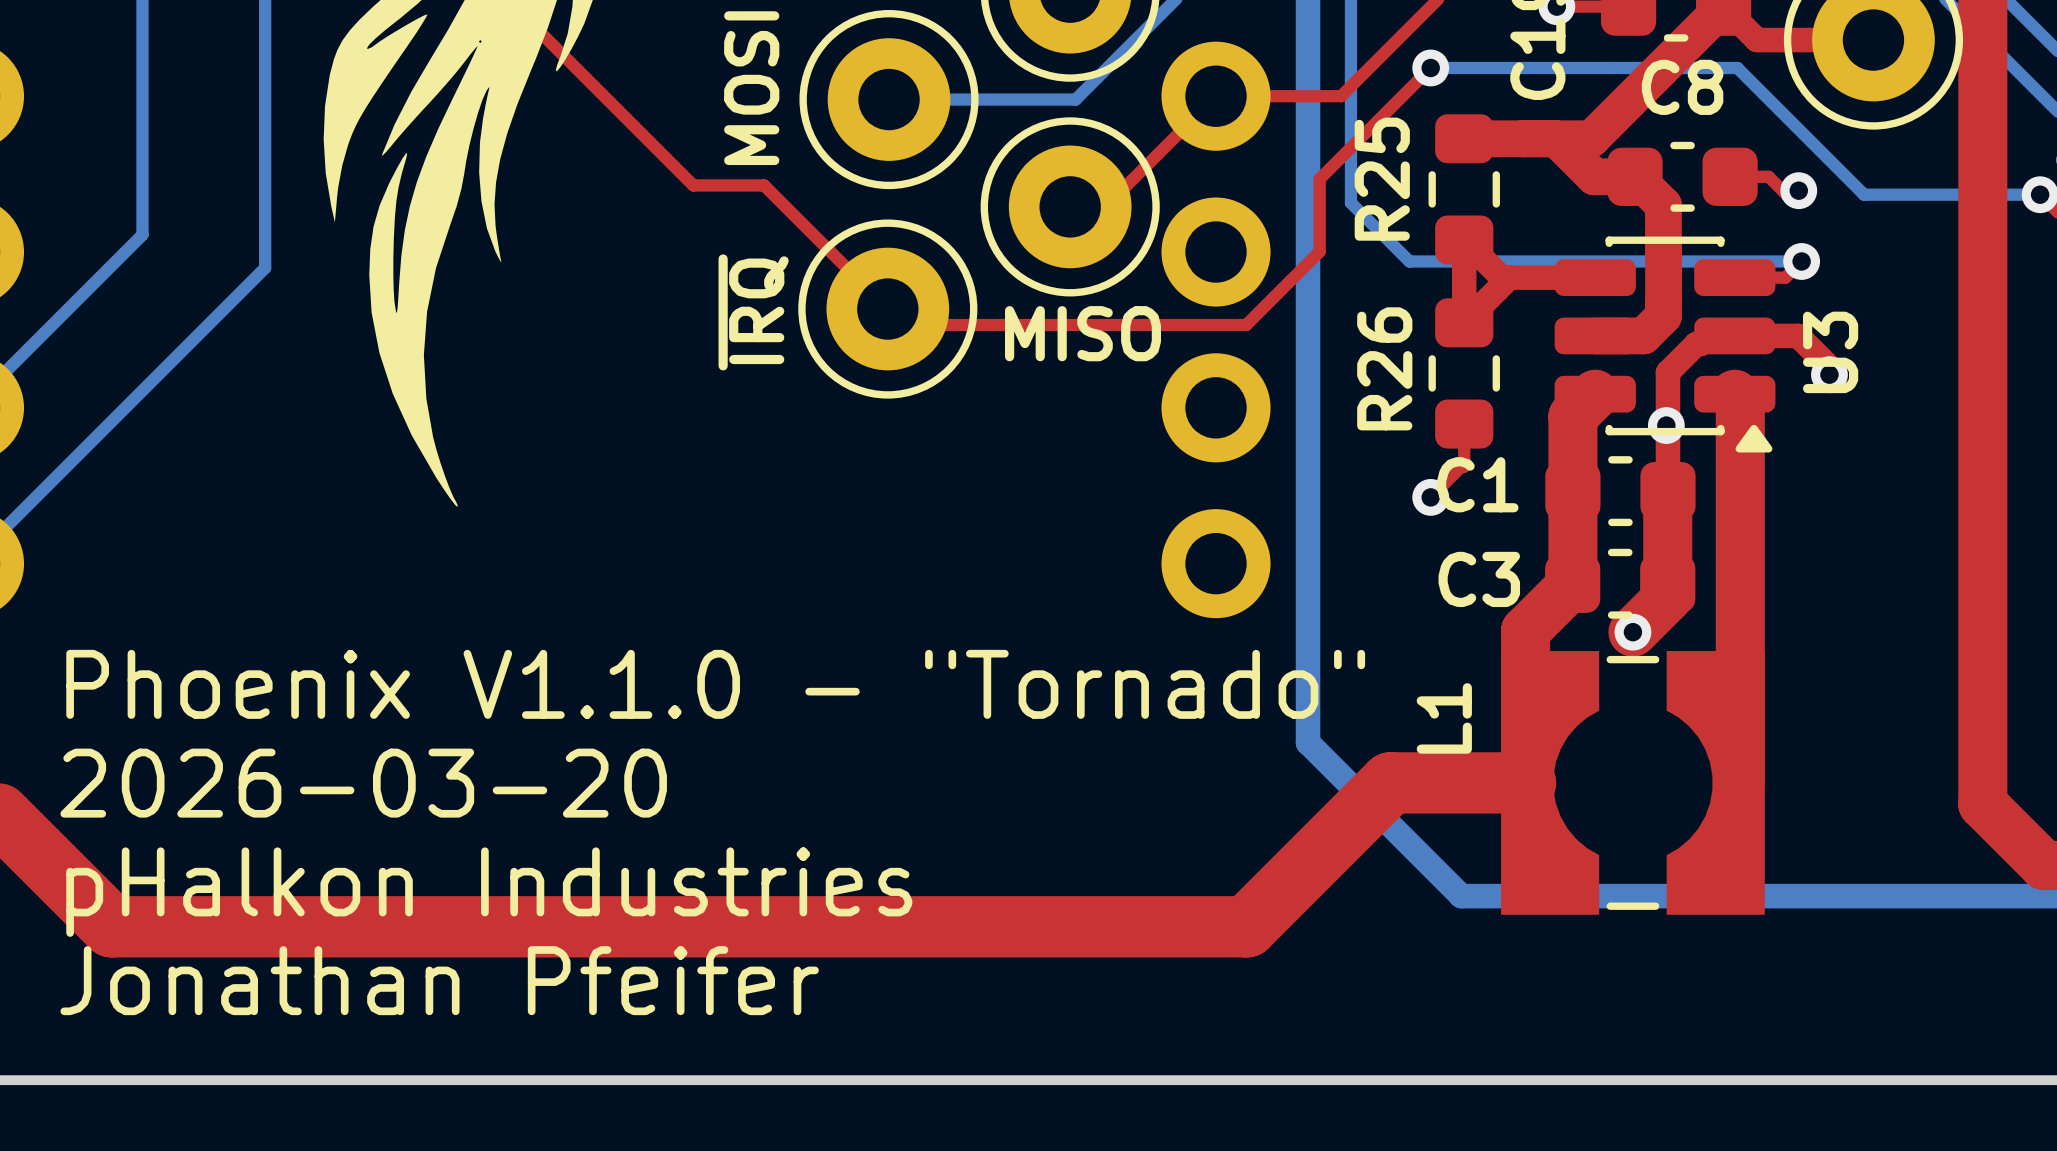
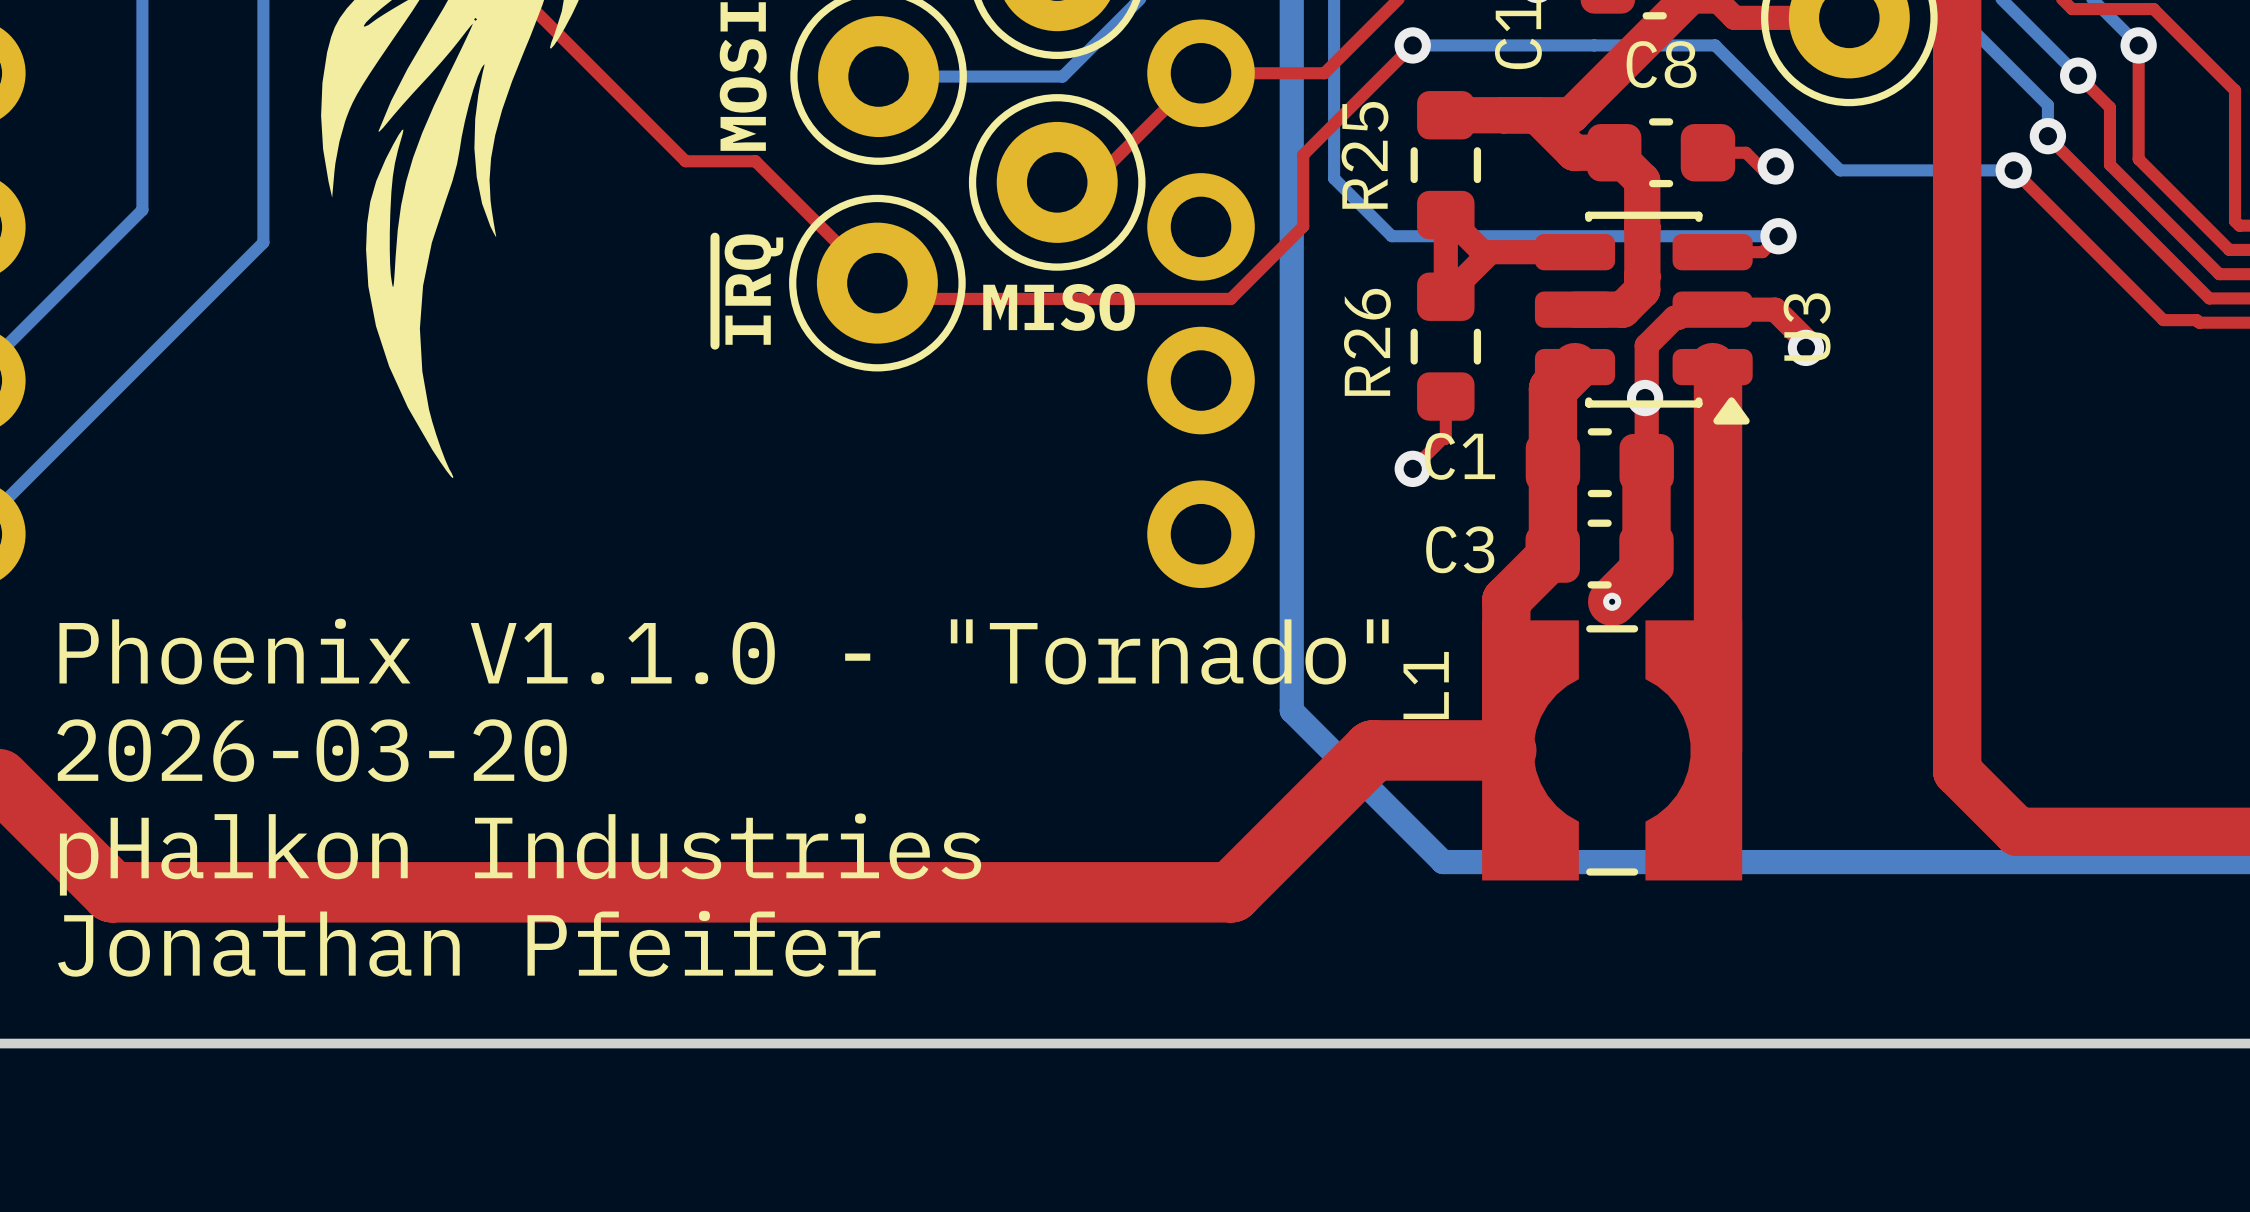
via size: [1614, 613, 1652, 651] -> [1603, 592, 1622, 611]

